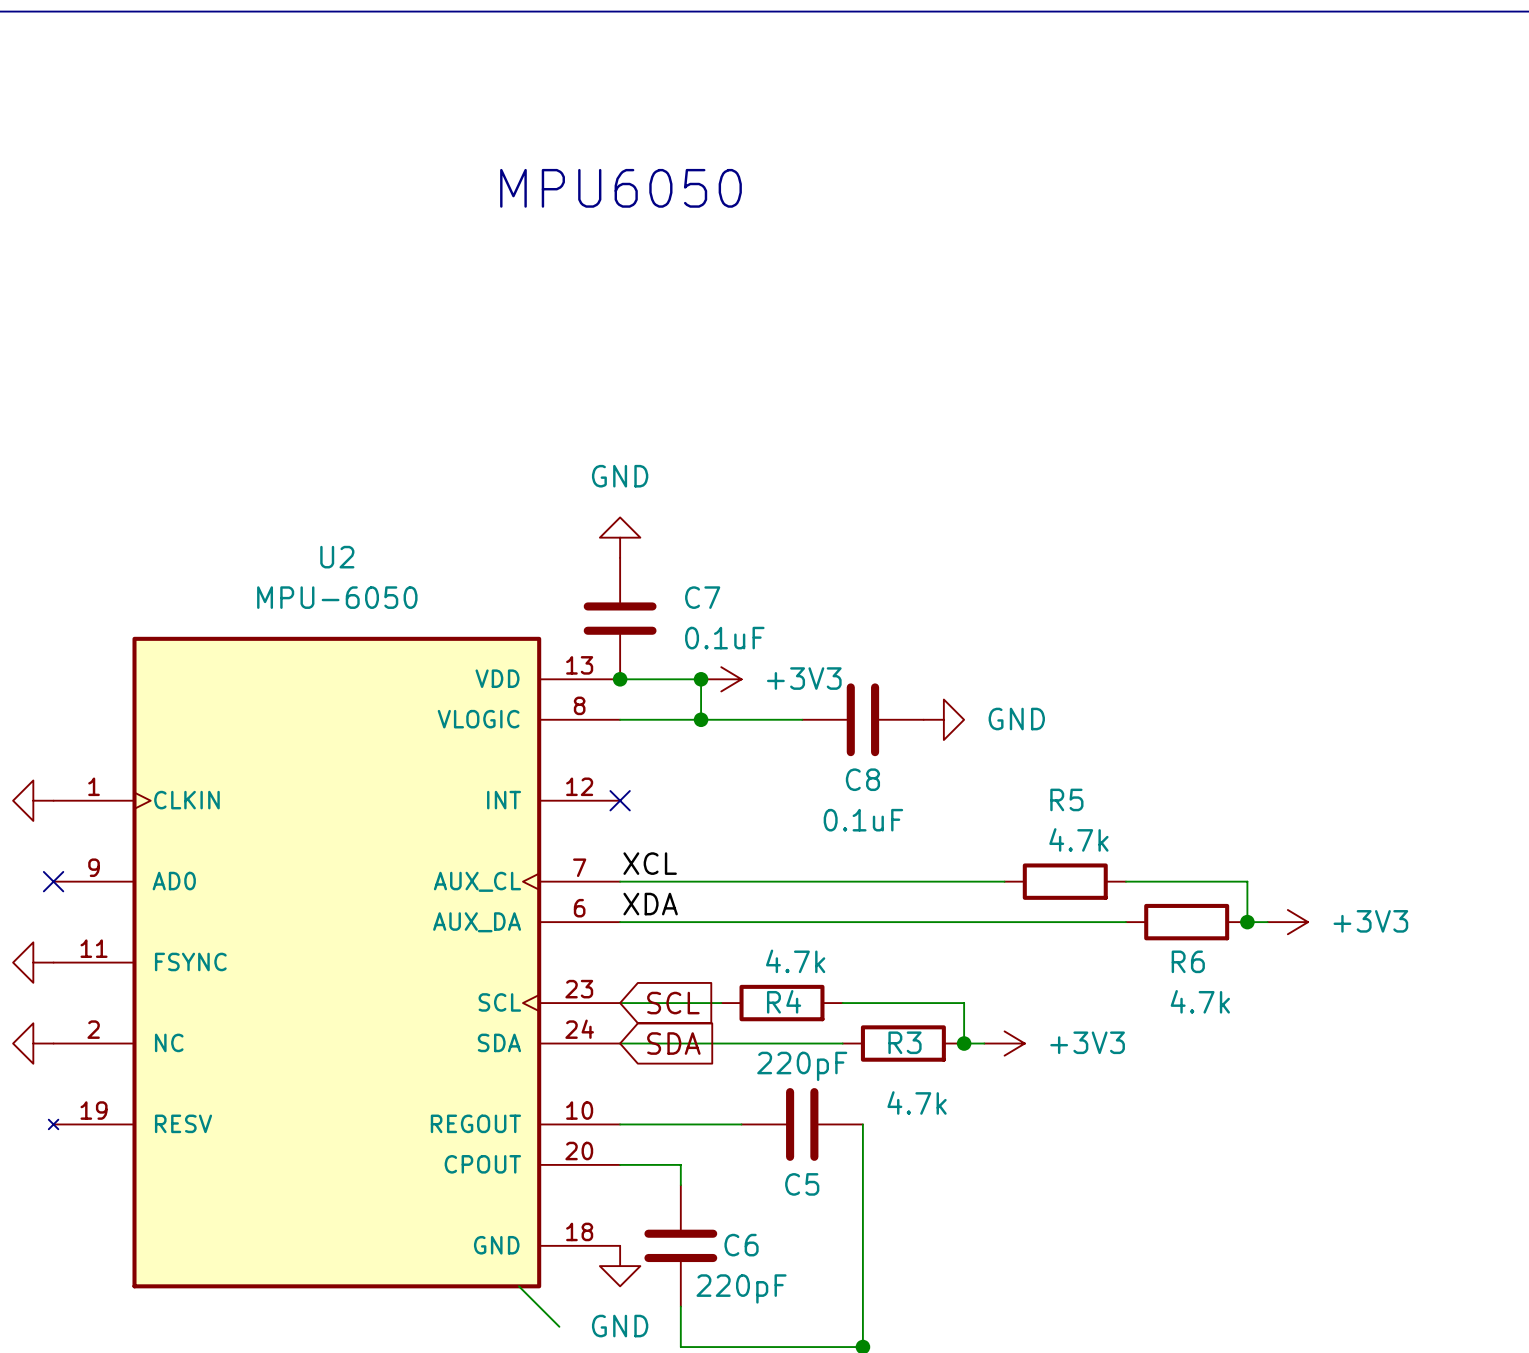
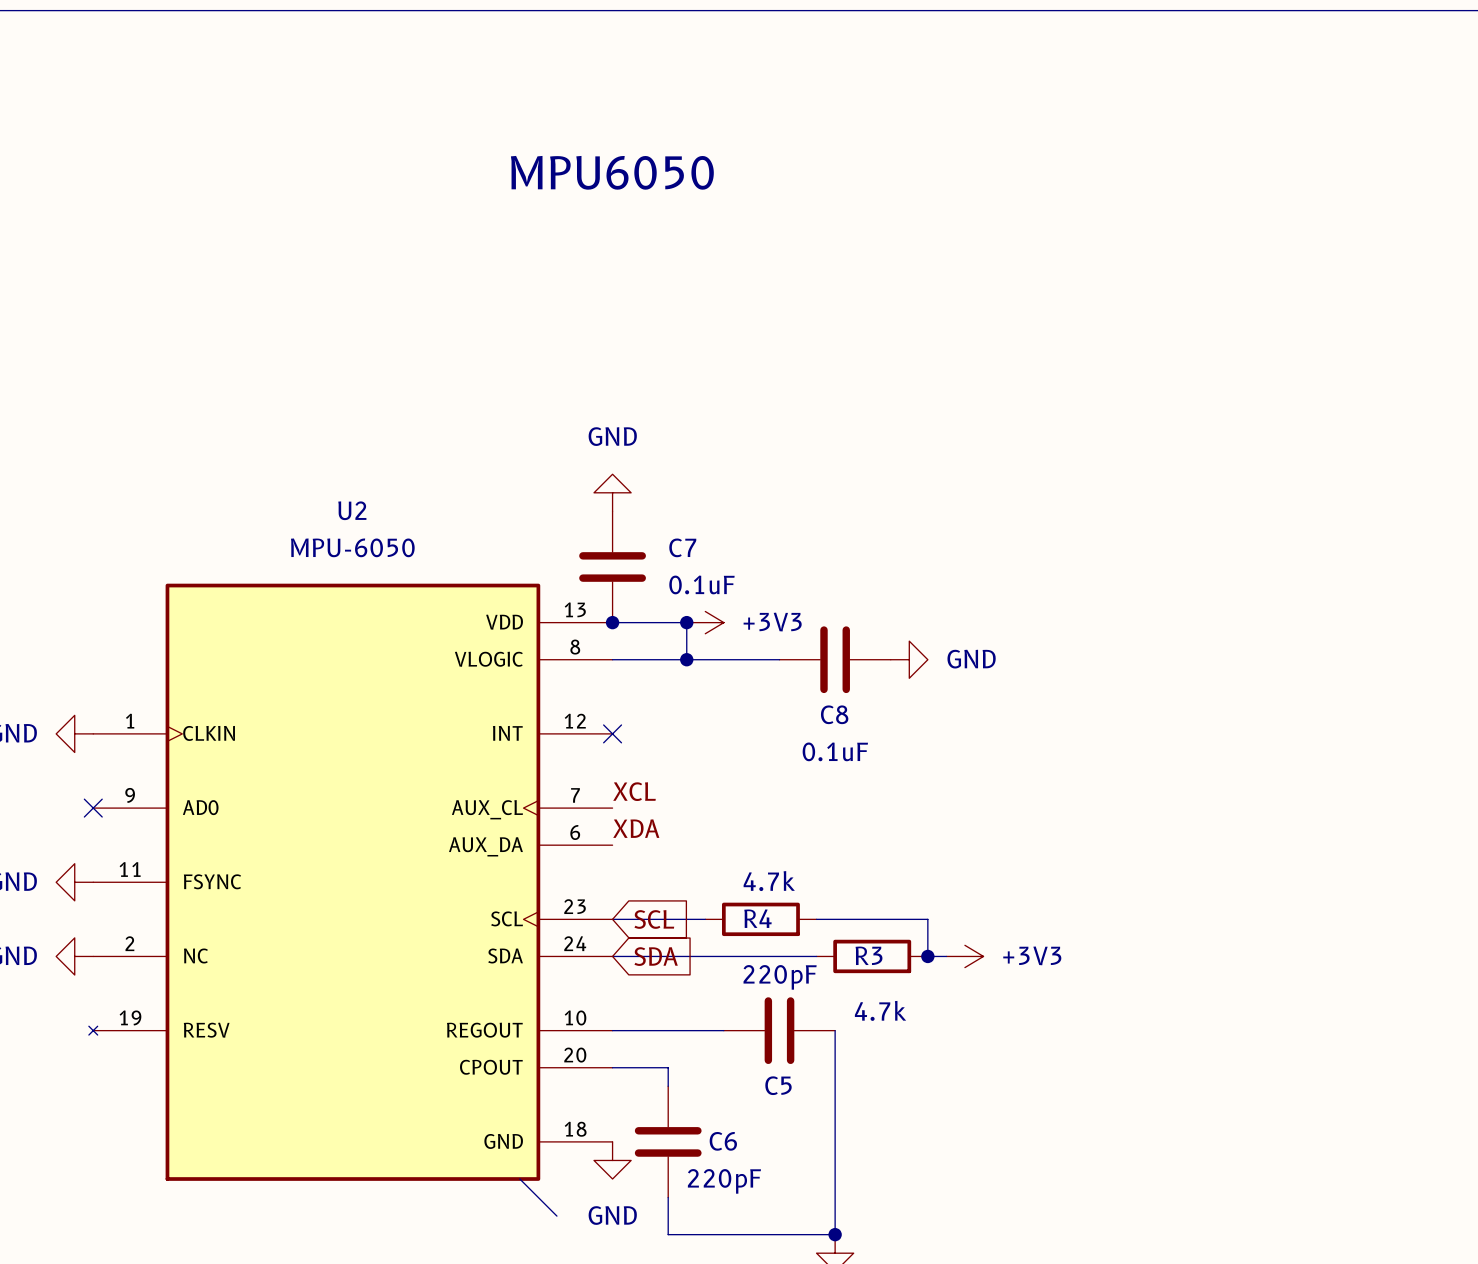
wire: (620, 881) (1004, 881) -> none
R5: 4.7k (1065, 881) -> none
wire: (1125, 881) (1247, 881) (1247, 922) (1267, 922) -> none
wire: (620, 922) (1125, 922) -> none
R6: 4.7k (1186, 922) -> none
junction: (1247, 922) -> none
power symbol: +3V3 (1287, 922) -> none

